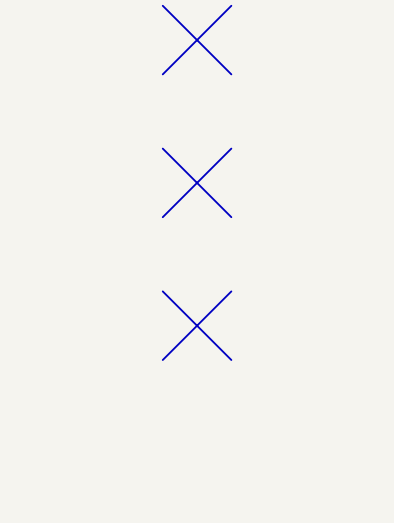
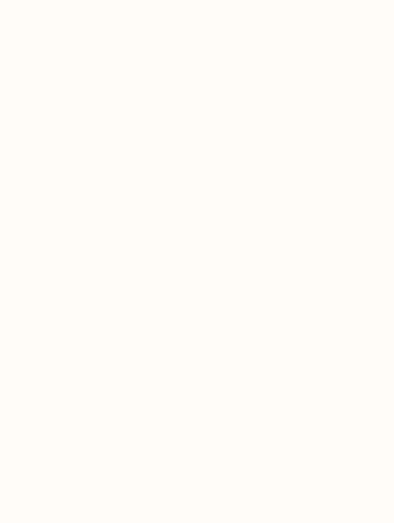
no-connect mark: (197, 40) -> none
no-connect mark: (197, 182) -> none
no-connect mark: (197, 325) -> none

